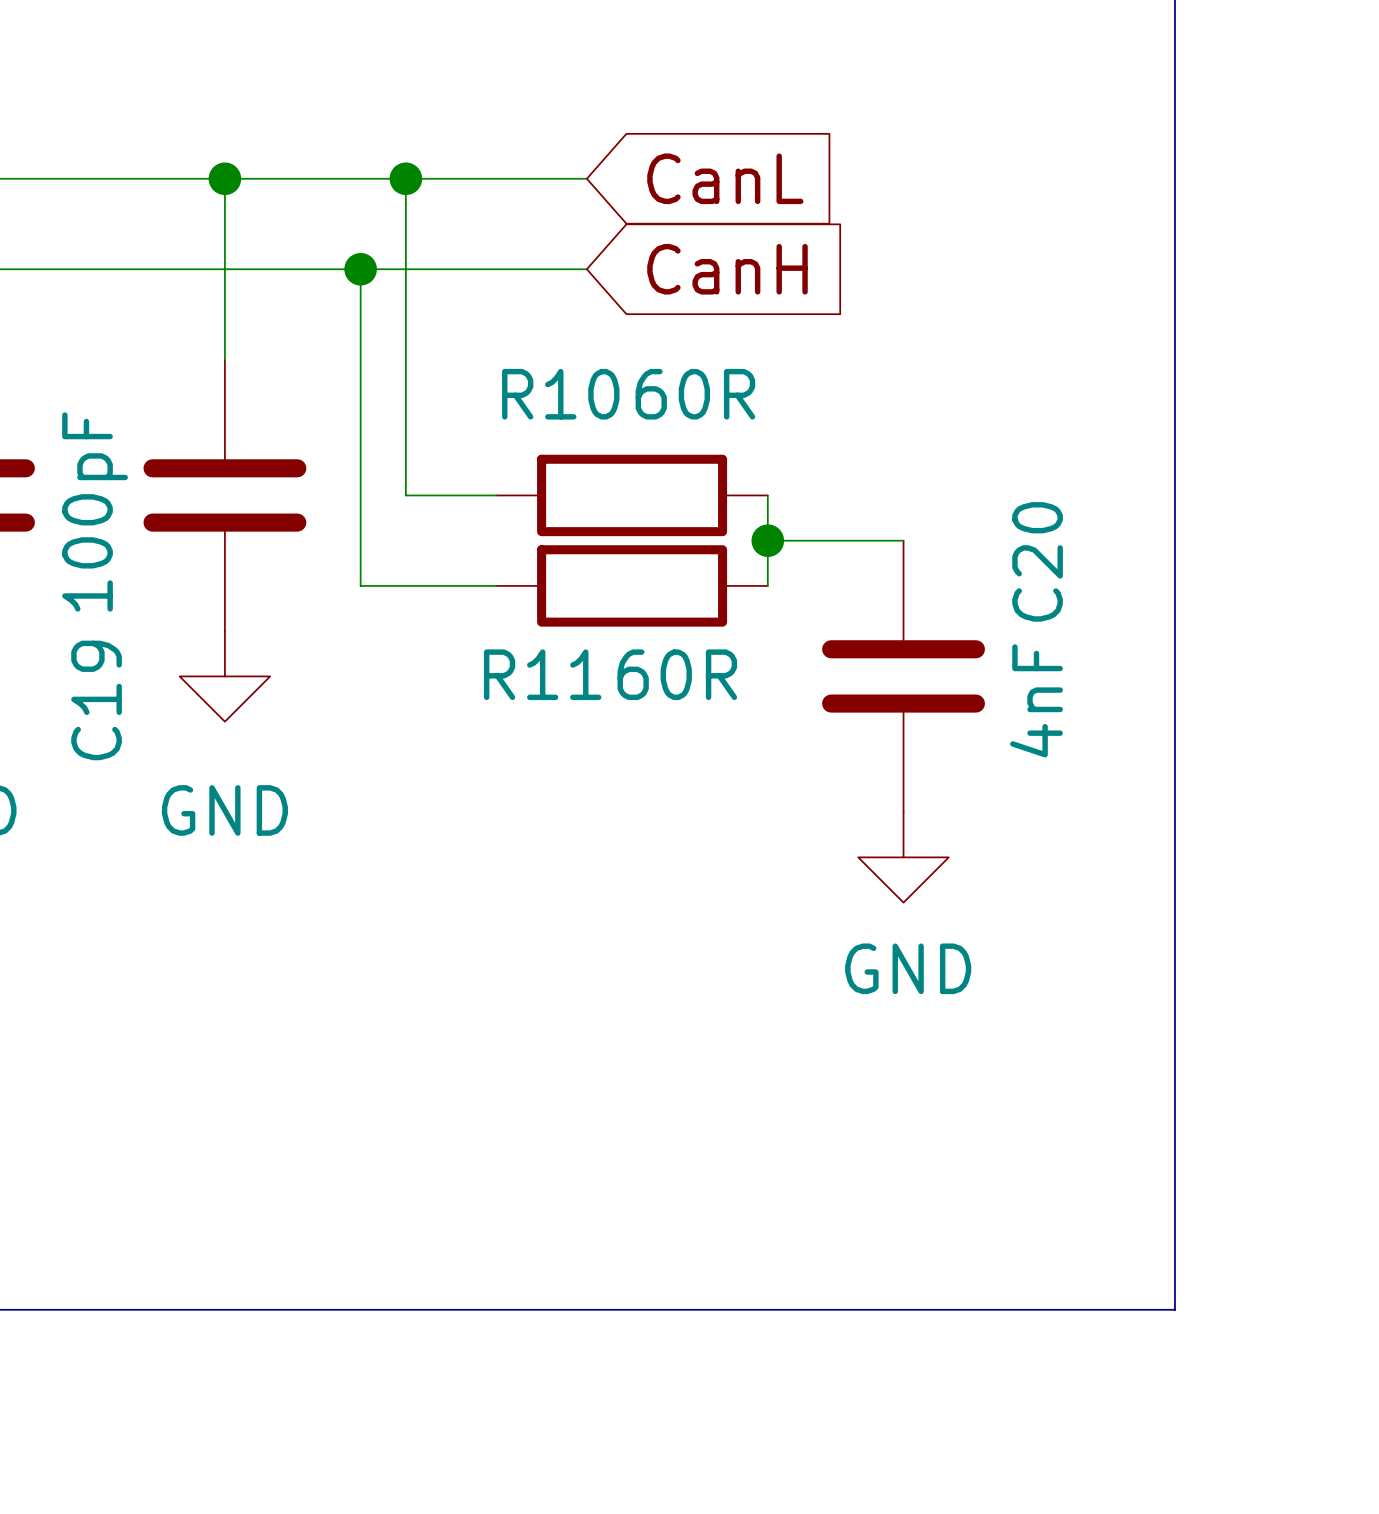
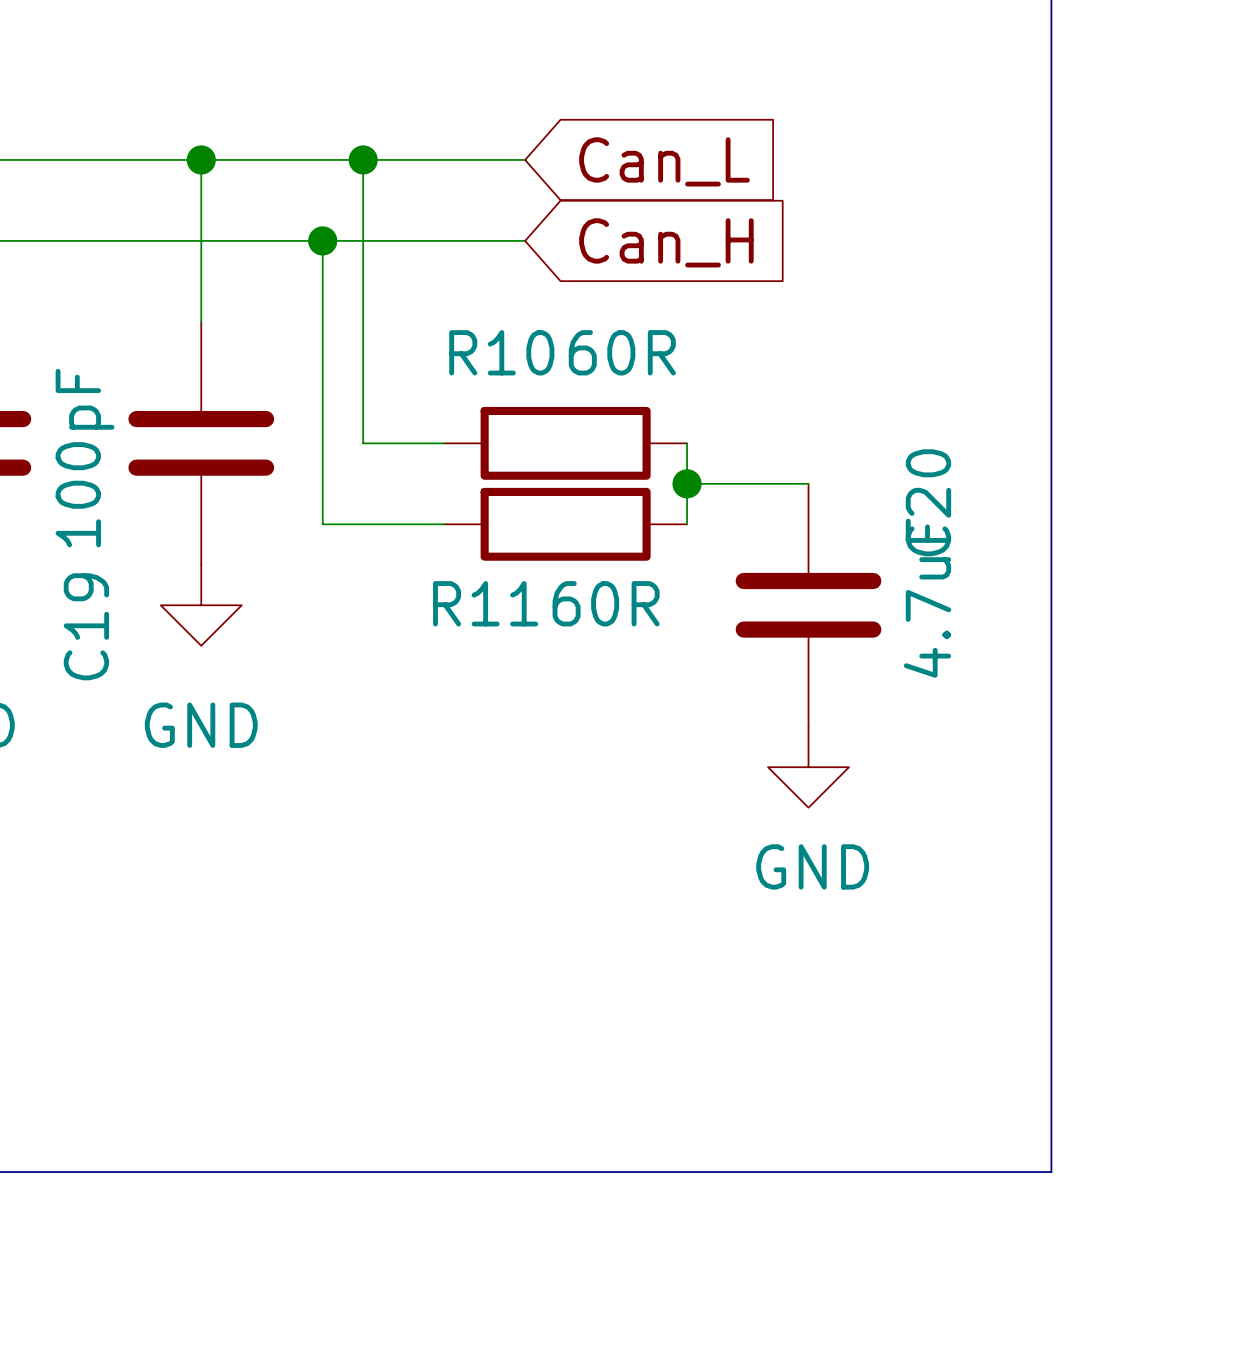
global label: CanL (725, 178) -> Can_L (664, 161)
global label: CanH (727, 269) -> Can_H (666, 242)
C20 value: 4nF (1036, 700) -> 4.7uF (927, 598)

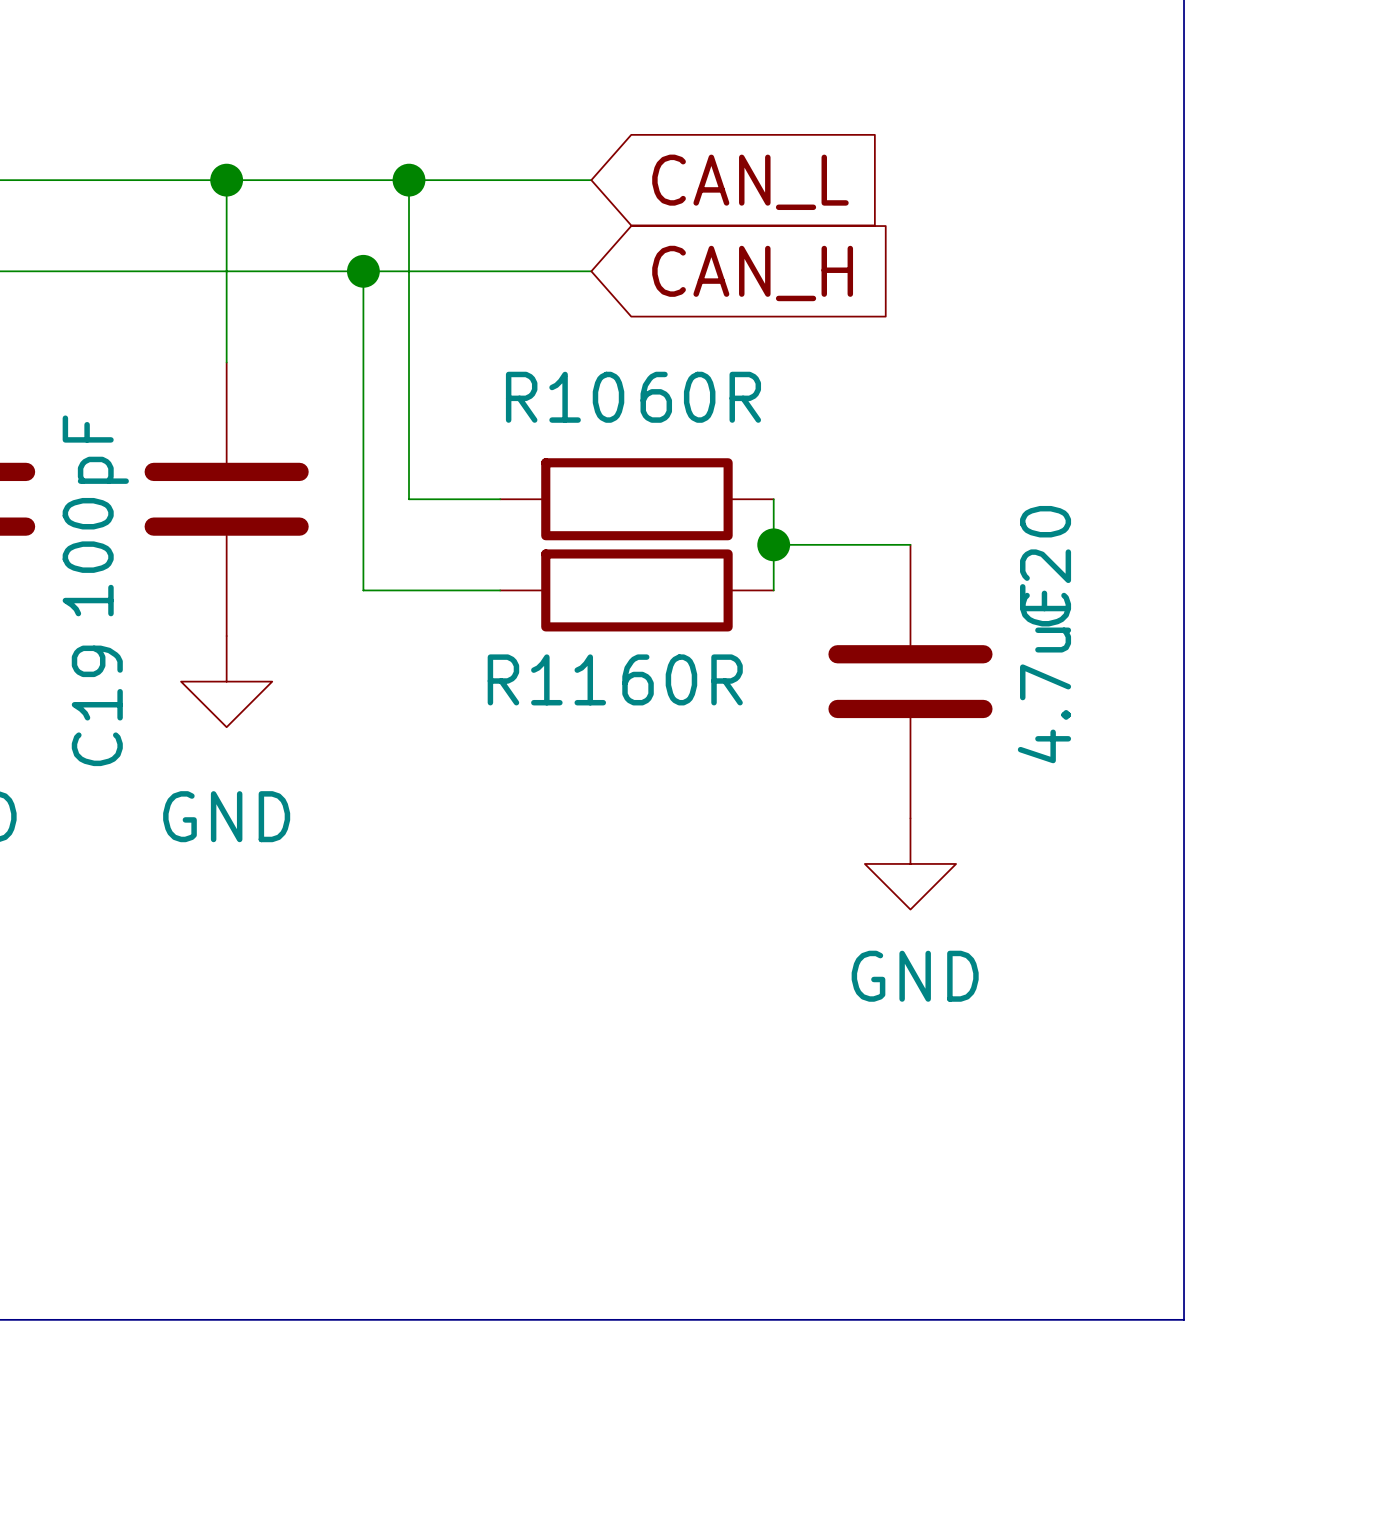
global label: Can_L (664, 161) -> CAN_L (750, 182)
global label: Can_H (666, 242) -> CAN_H (752, 273)

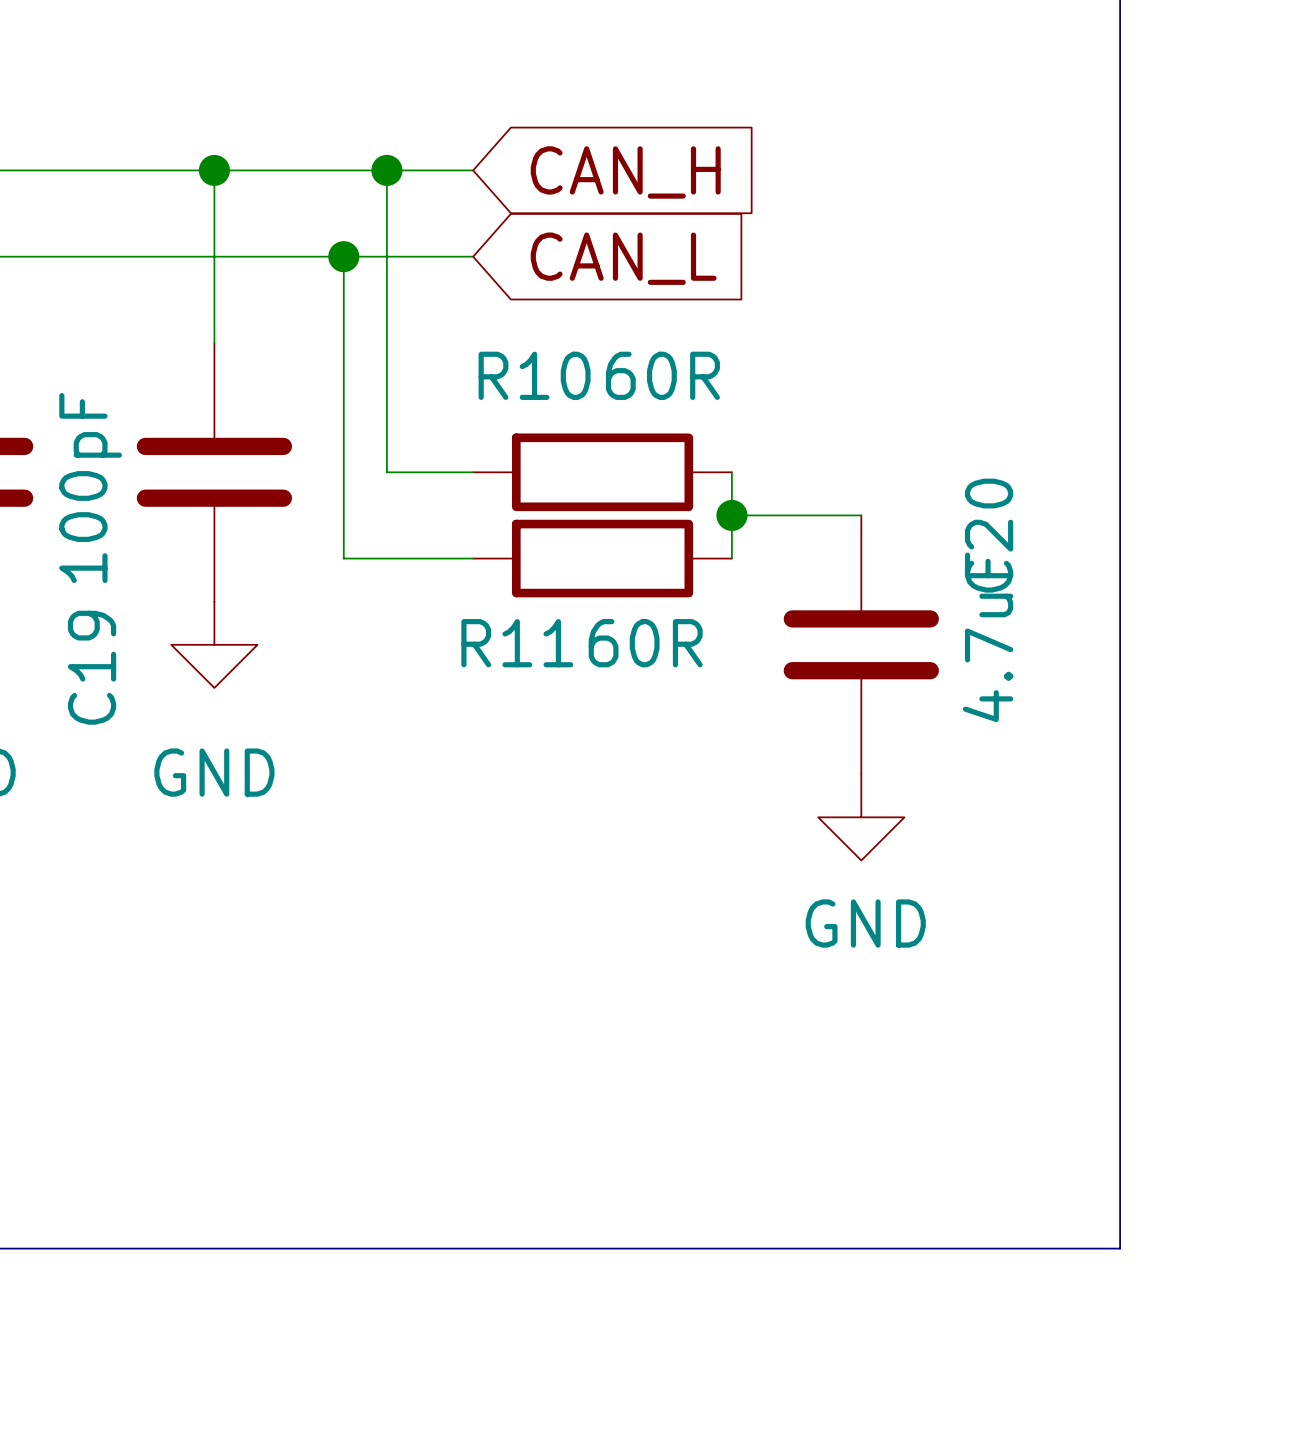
wire: (500, 180) (591, 180) -> none
global label position: CAN_L (750, 182) -> CAN_L (623, 258)
wire: (500, 271) (591, 271) -> none
global label position: CAN_H (752, 273) -> CAN_H (625, 172)

